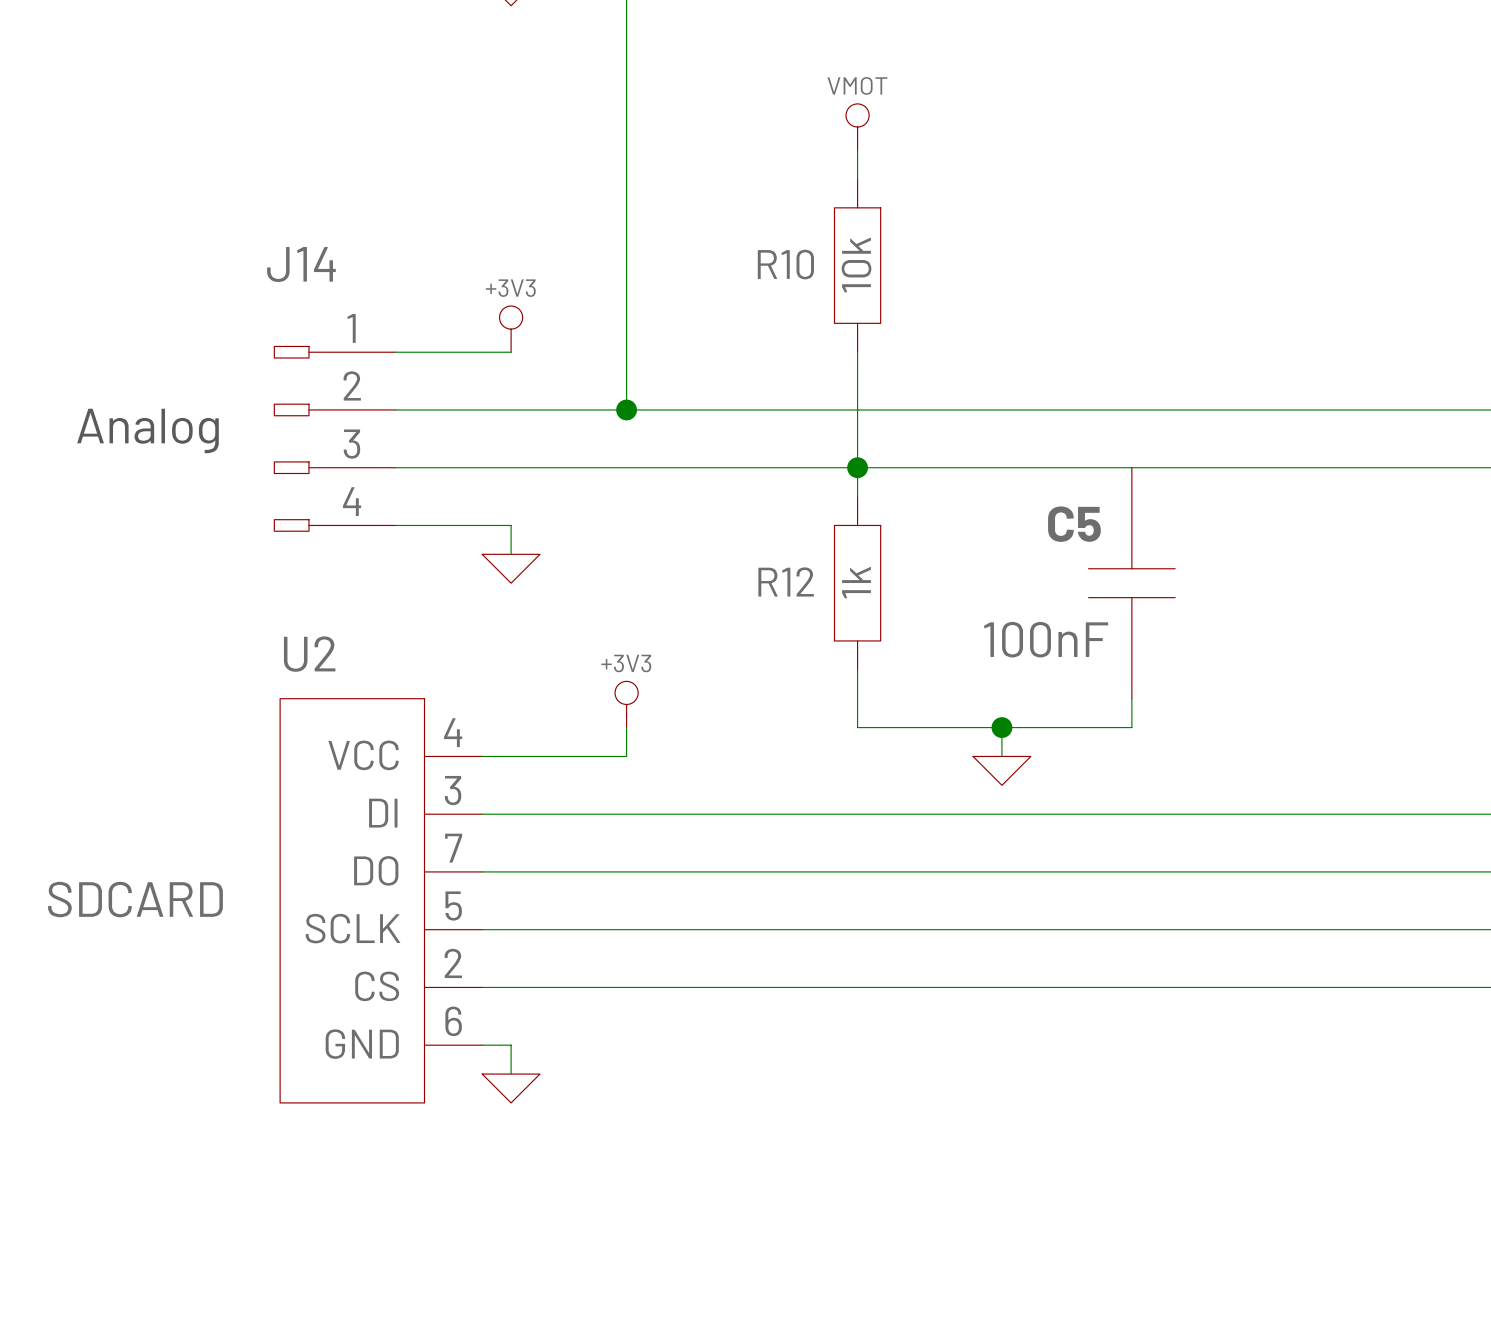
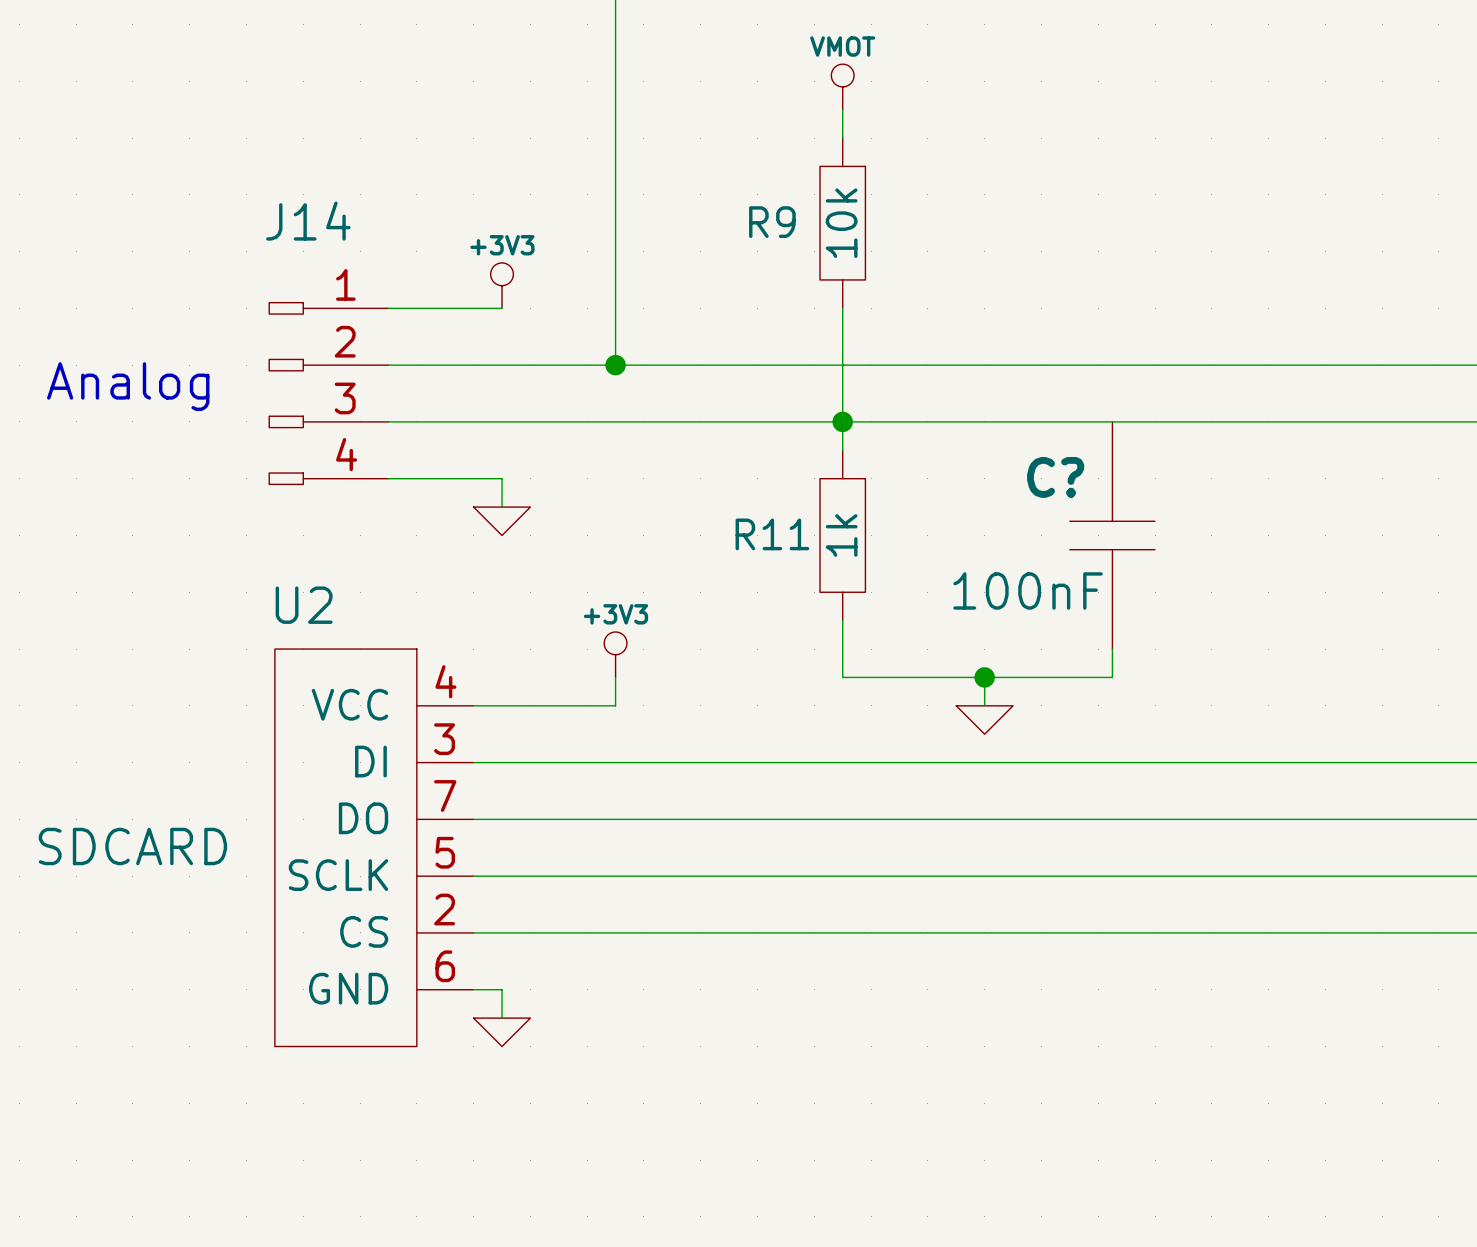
R10 name: R10 (785, 264) -> R9 (772, 222)
C5 name: C5 (1074, 524) -> C? (1055, 477)
R12 name: R12 (786, 581) -> R11 (772, 534)

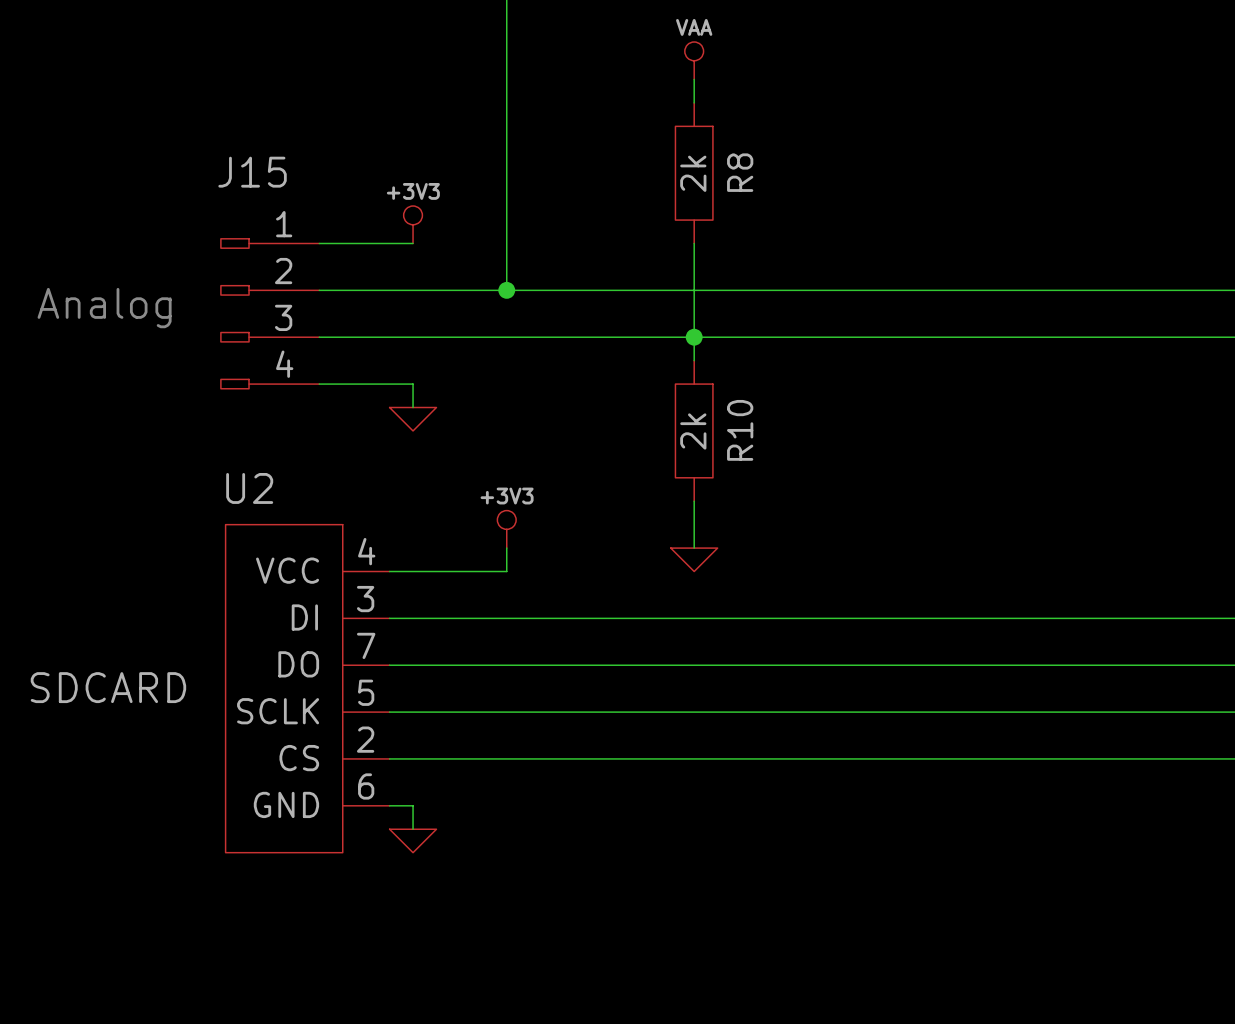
power symbol: VMOT (842, 86) -> VAA (694, 60)
J14 name: J14 (308, 221) -> J15 (252, 172)
R9 name: R9 (772, 222) -> R8 (740, 172)
R9 value: 10k (841, 223) -> 2k (693, 173)
R11 name: R11 (772, 534) -> R10 (740, 430)
R11 value: 1k (841, 535) -> 2k (693, 431)
C?: 100nF (1112, 535) -> none
wire: (1112, 649) (1112, 677) (842, 677) -> none
wire: (984, 677) (984, 705) -> none
junction: (984, 677) -> none
power symbol position: (984, 720) -> (694, 559)

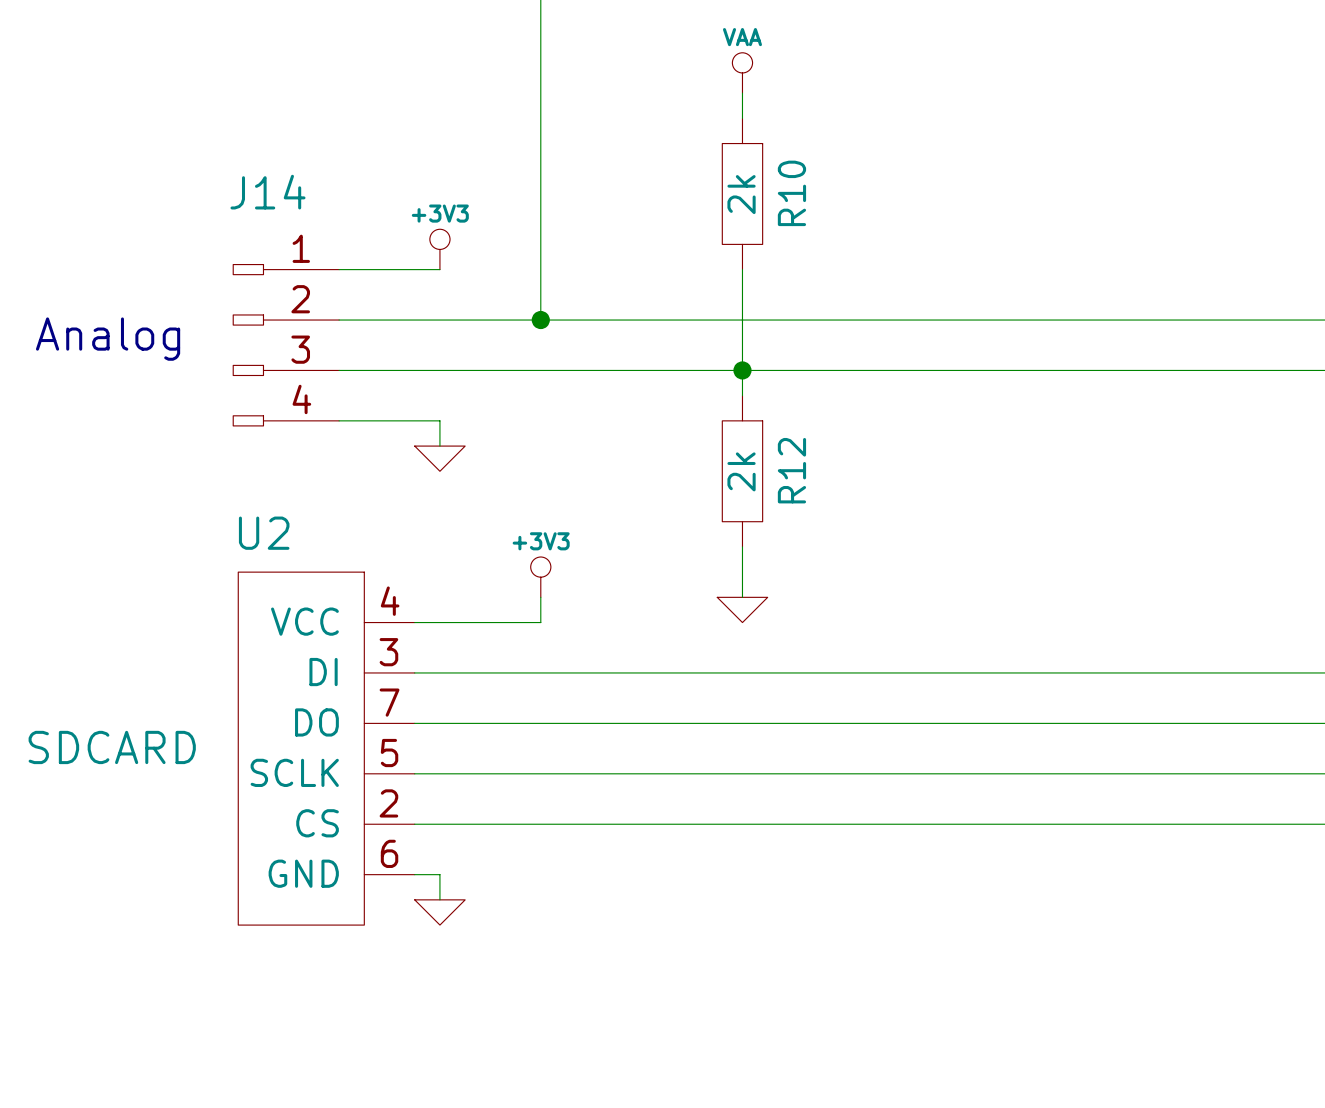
J15 name: J15 (252, 172) -> J14 (267, 192)
R8 name: R8 (740, 172) -> R10 (791, 193)
R10 name: R10 (740, 430) -> R12 (791, 470)

